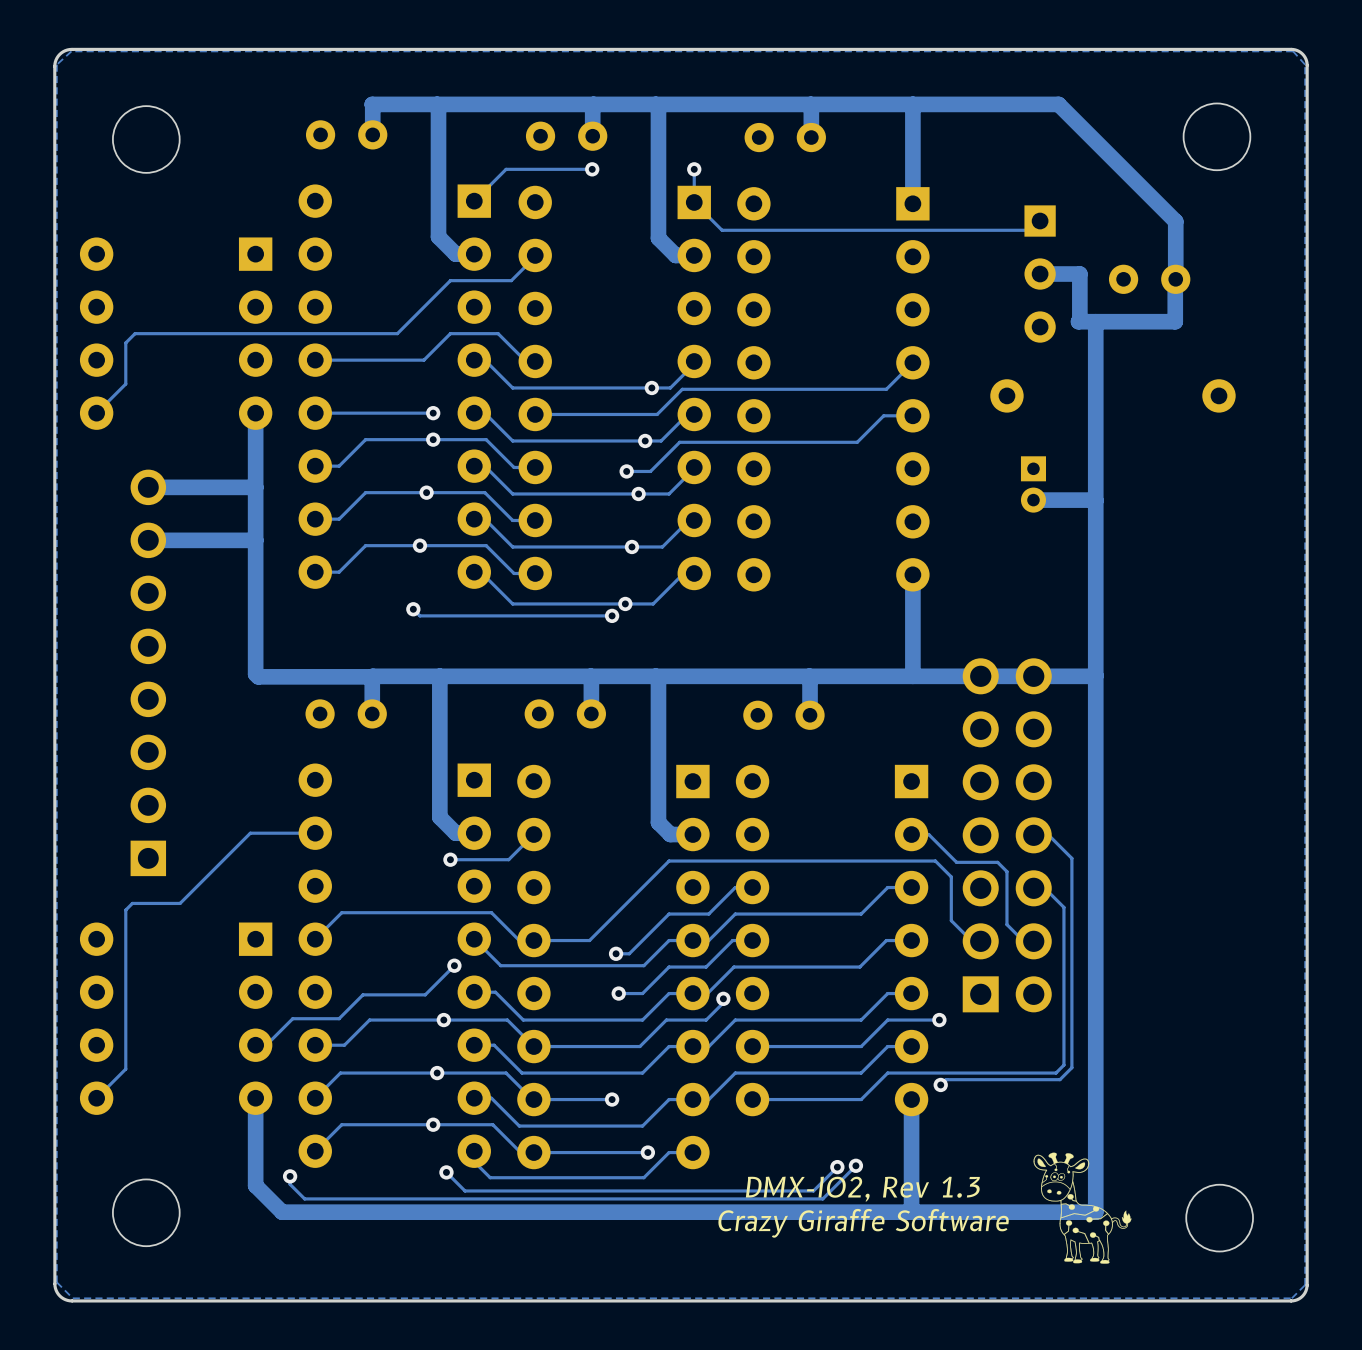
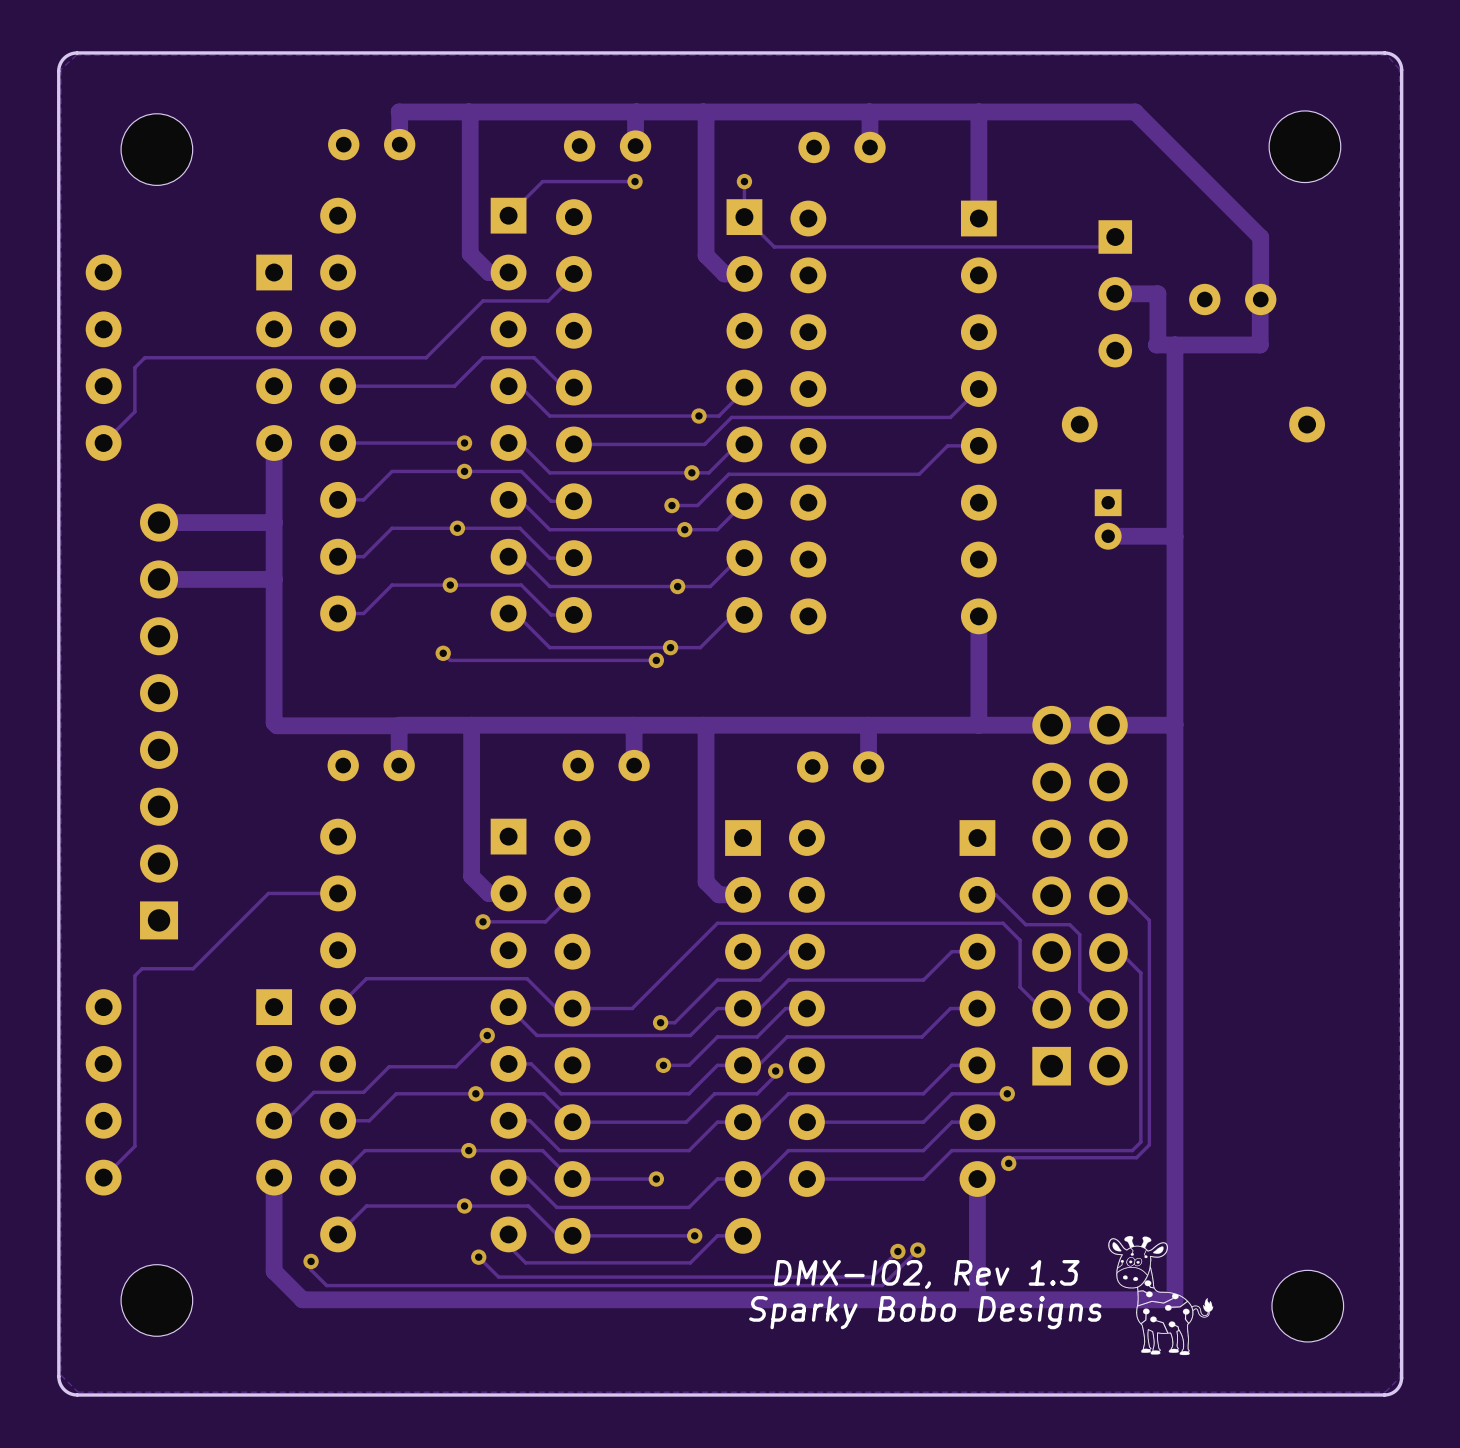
text: Crazy Giraffe Software (863, 1223) -> Sparky Bobo Designs (925, 1312)

